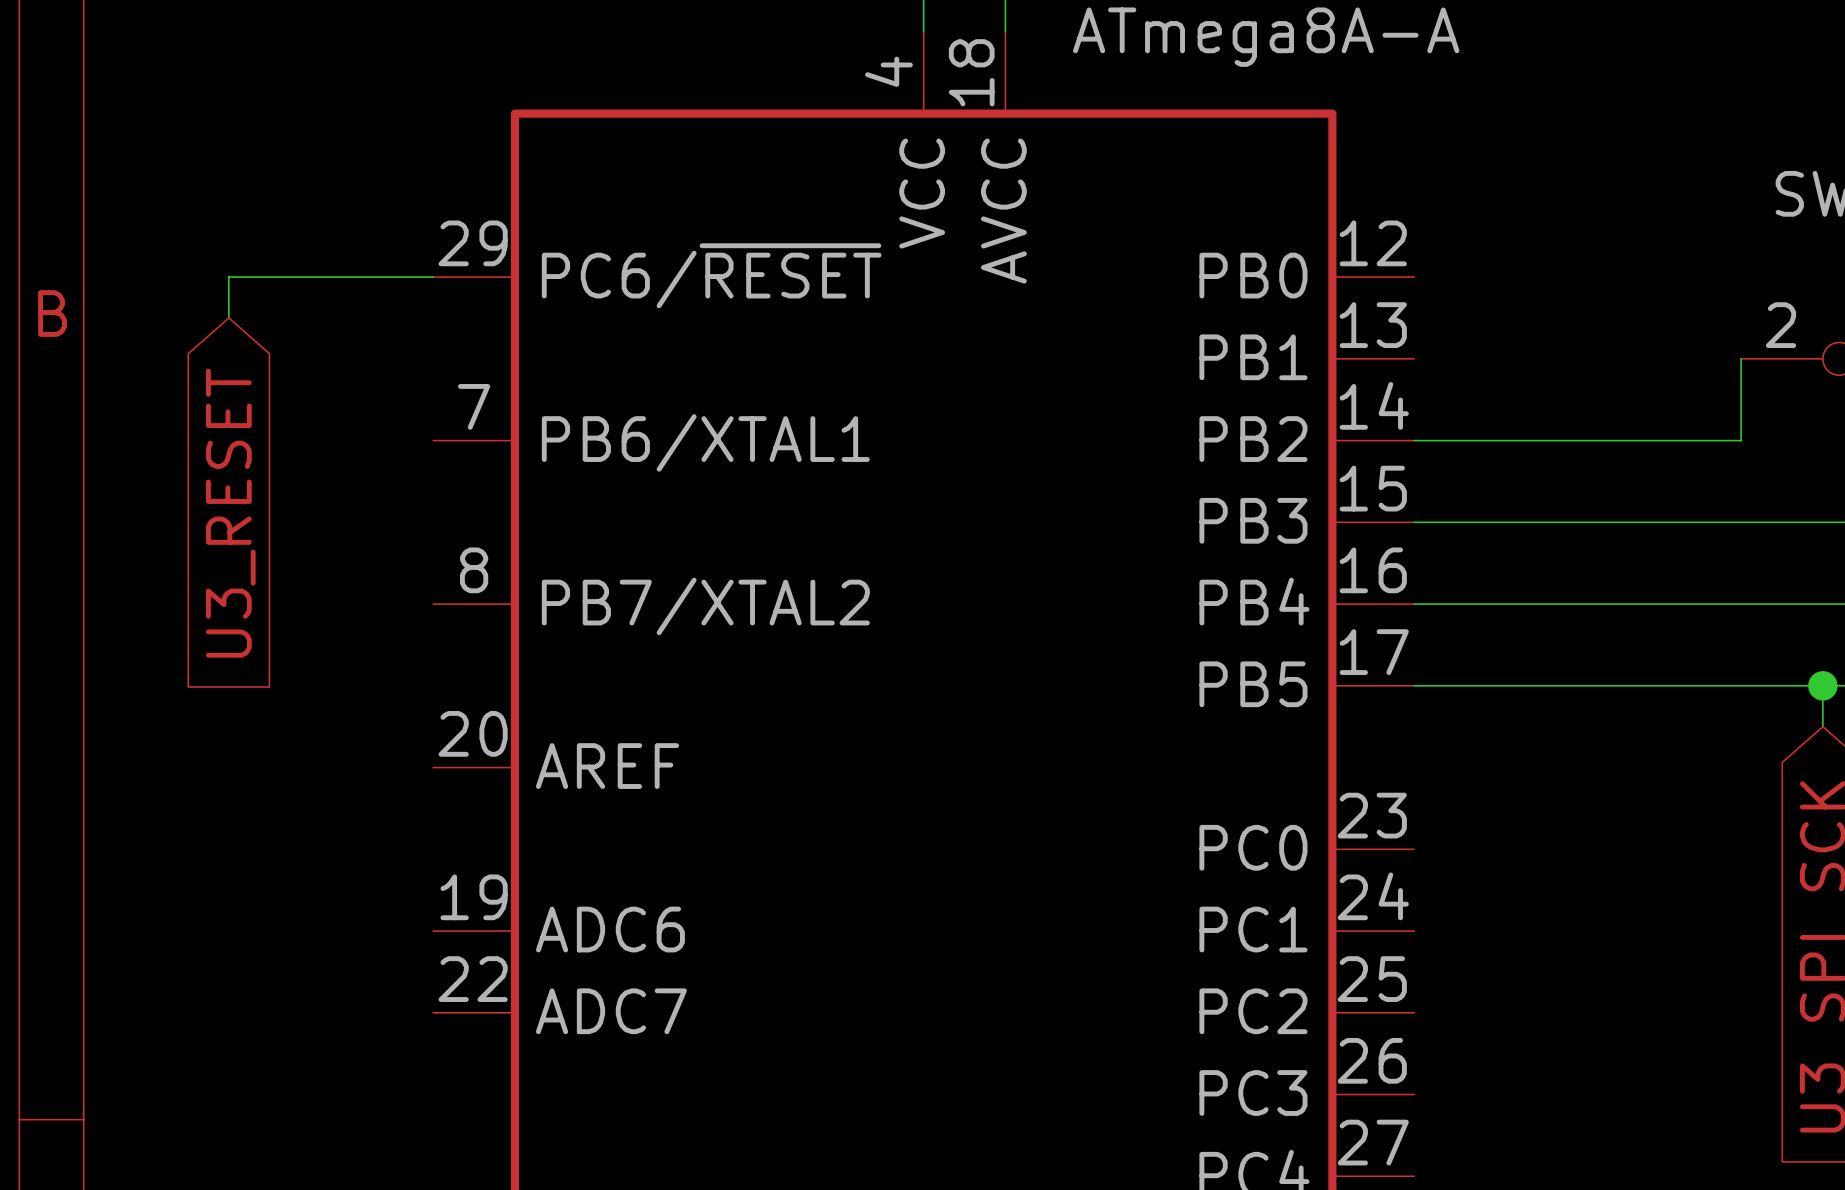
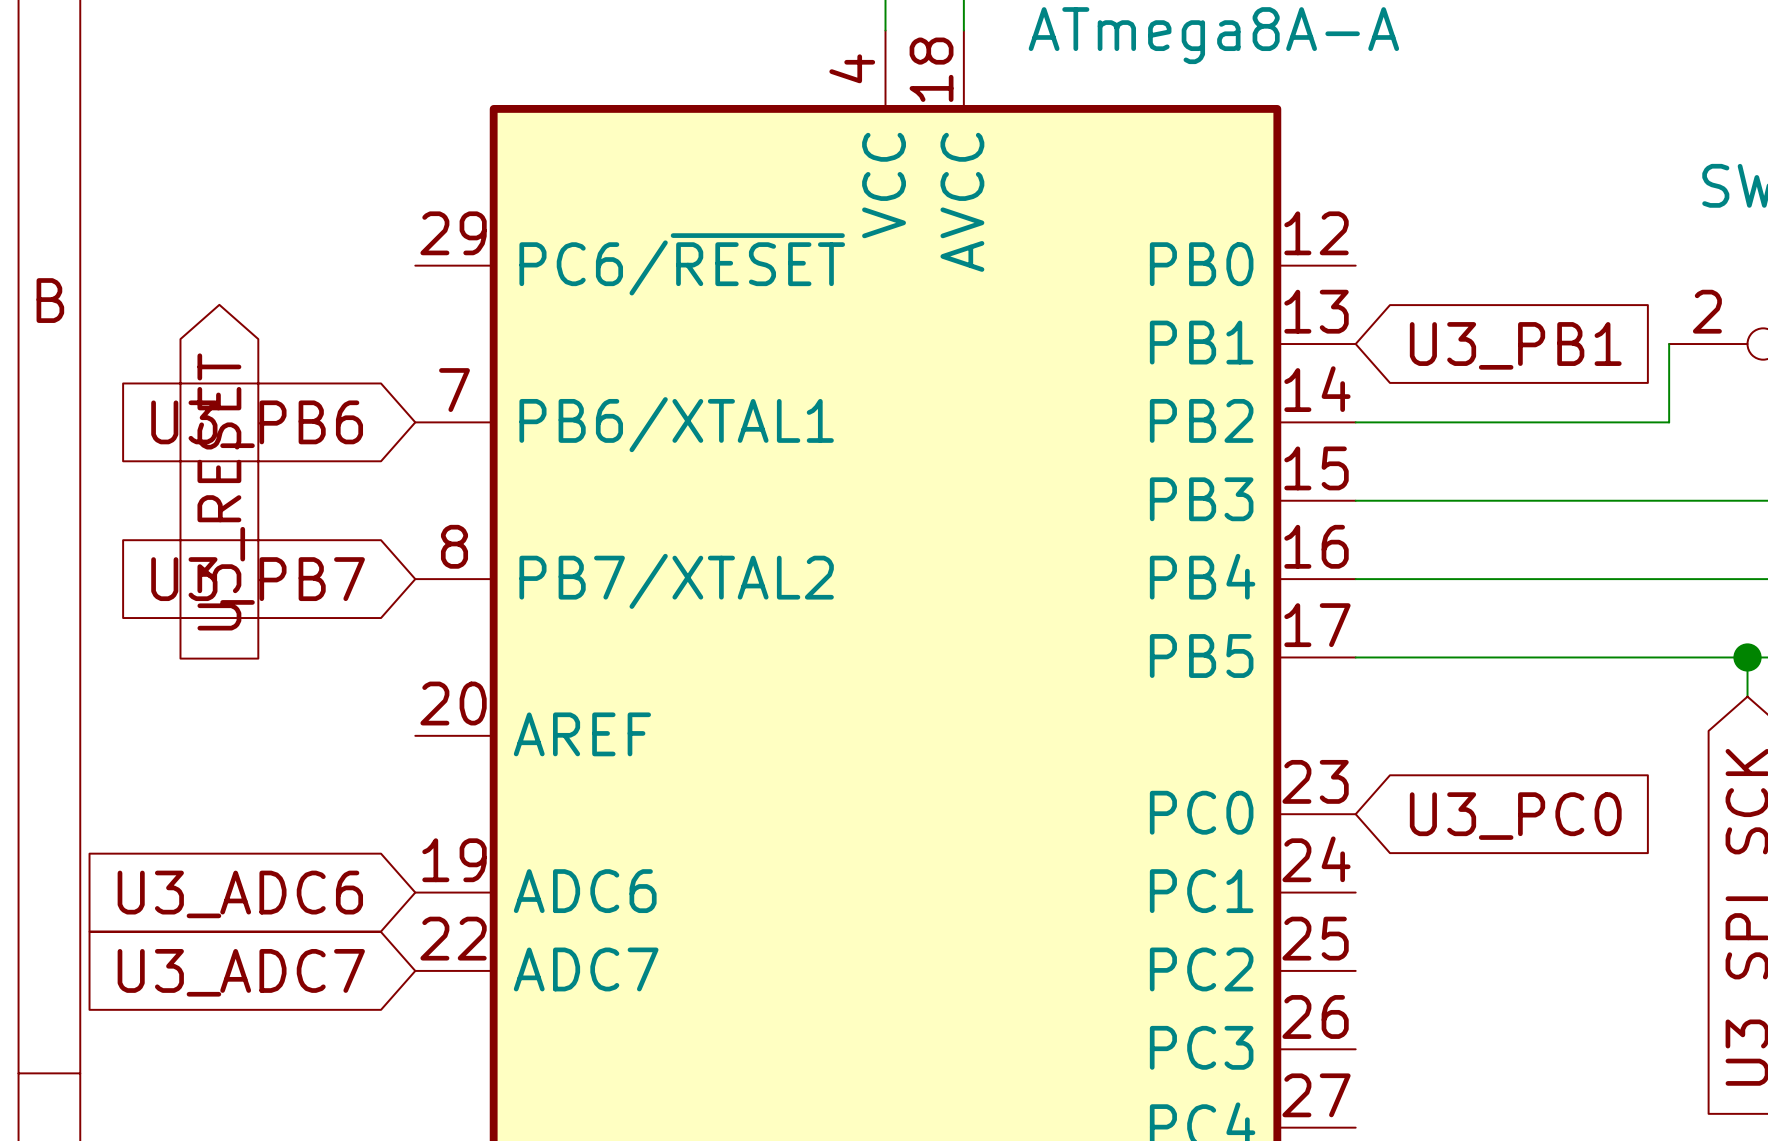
wire: (433, 277) (228, 277) (228, 317) -> none
global label: none -> U3_PB1 (1515, 345)
global label: none -> U3_PB6 (257, 424)
global label: none -> U3_PB7 (258, 580)
global label: none -> U3_PC0 (1515, 816)
global label: none -> U3_ADC6 (240, 894)
global label: none -> U3_ADC7 (241, 972)

